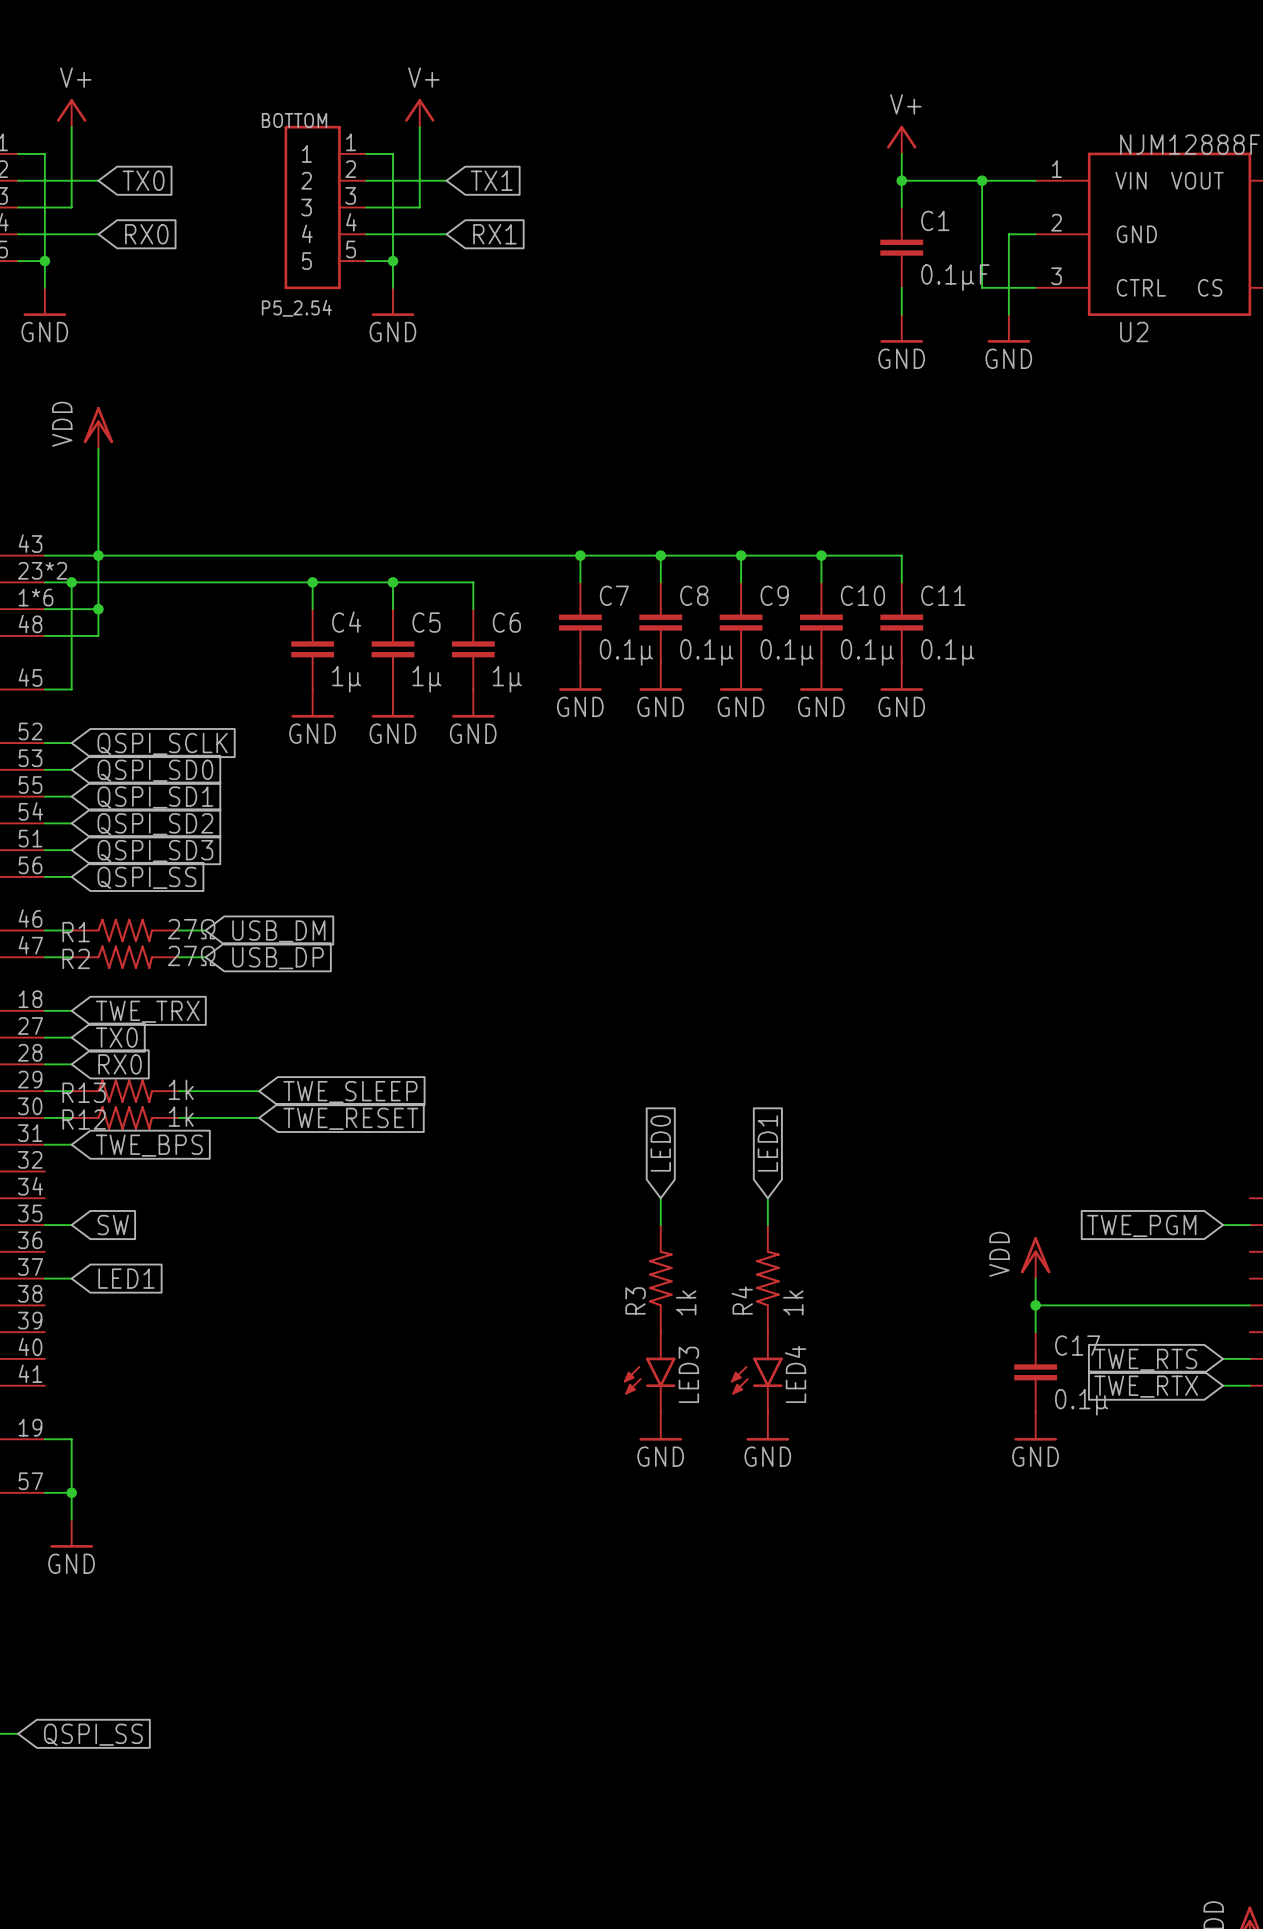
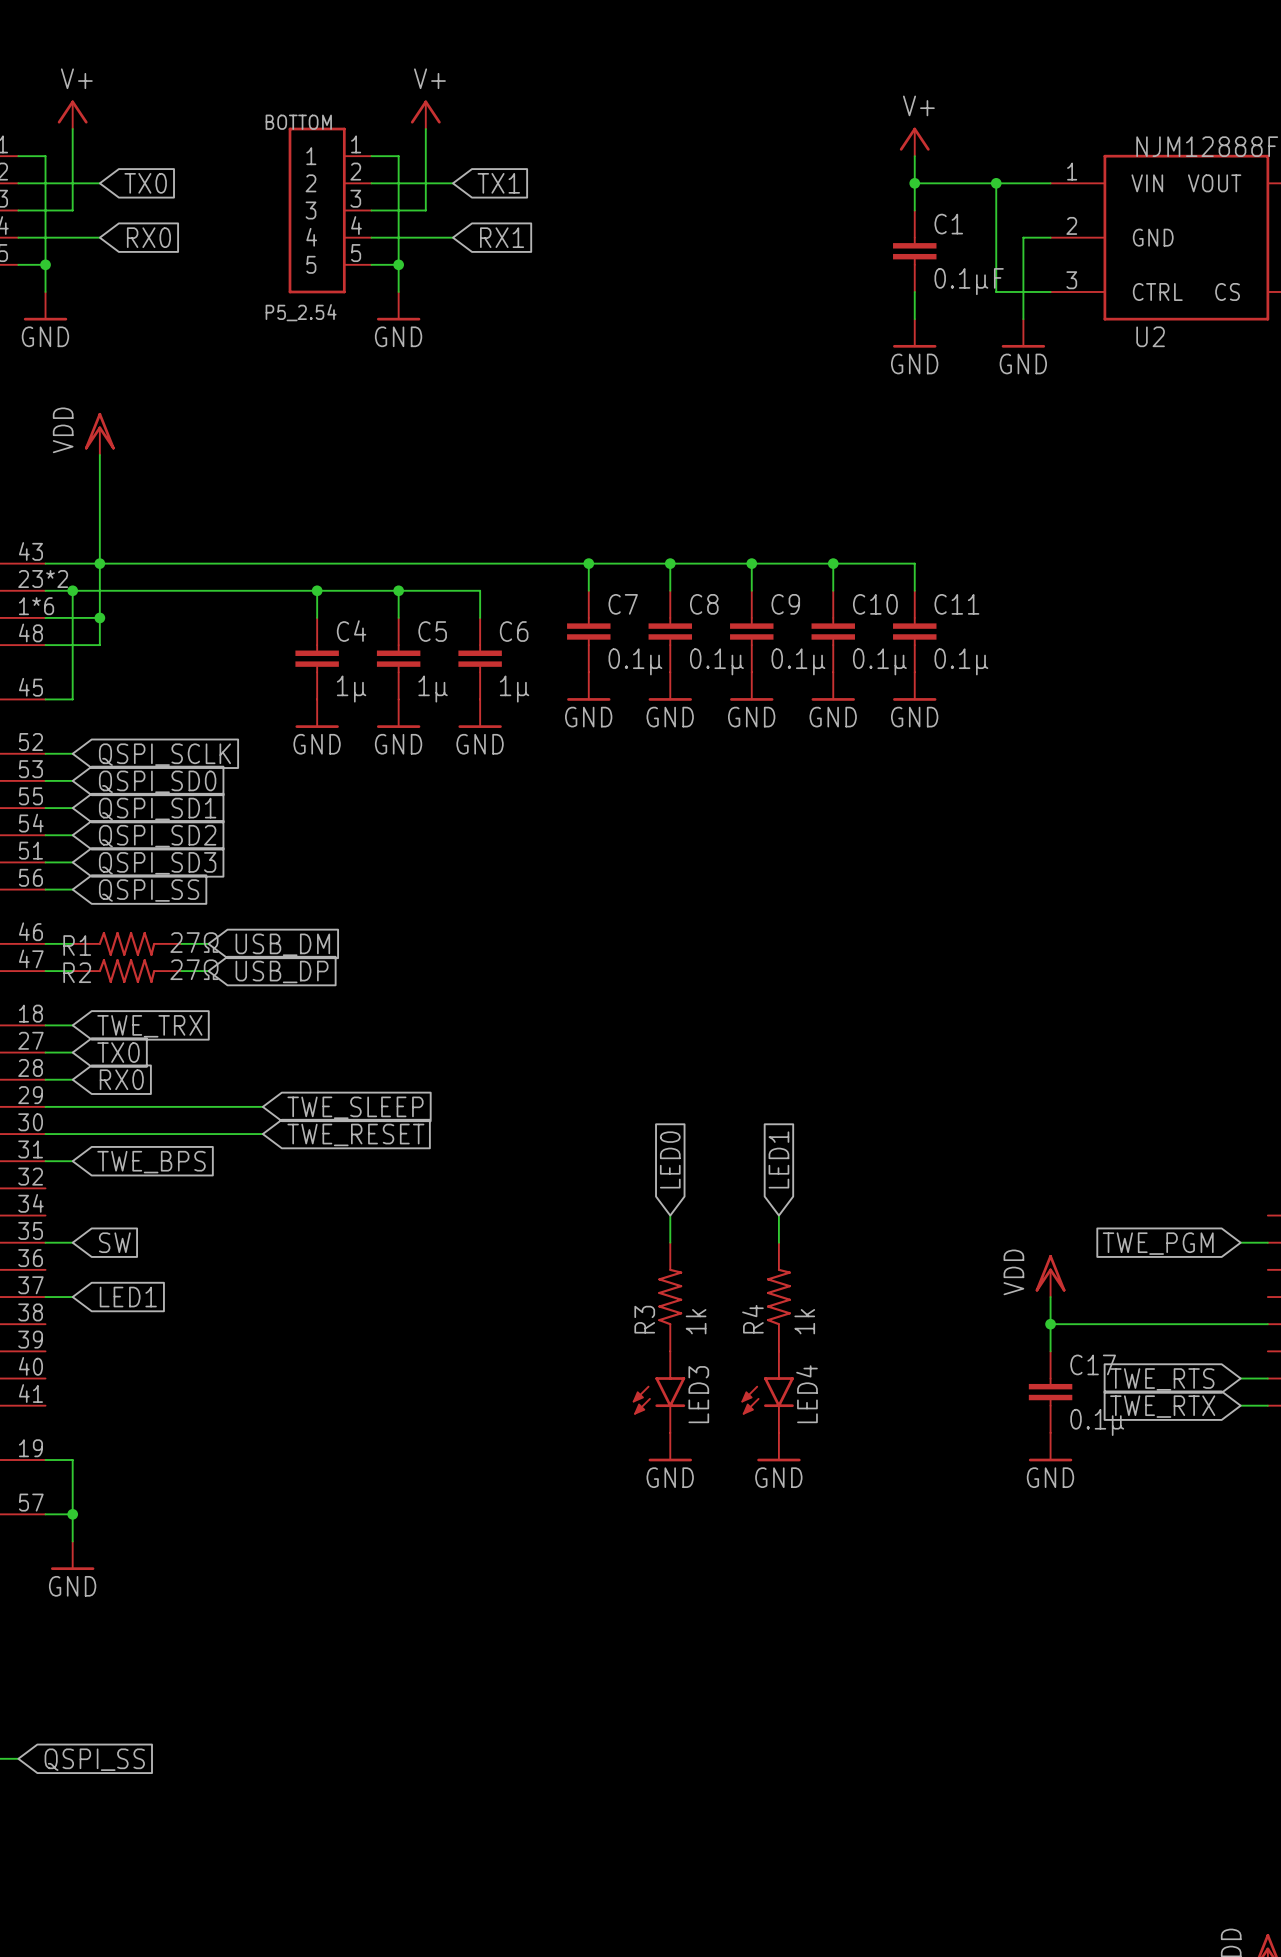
R13: 1k (125, 1091) -> none
R12: 1k (125, 1117) -> none

